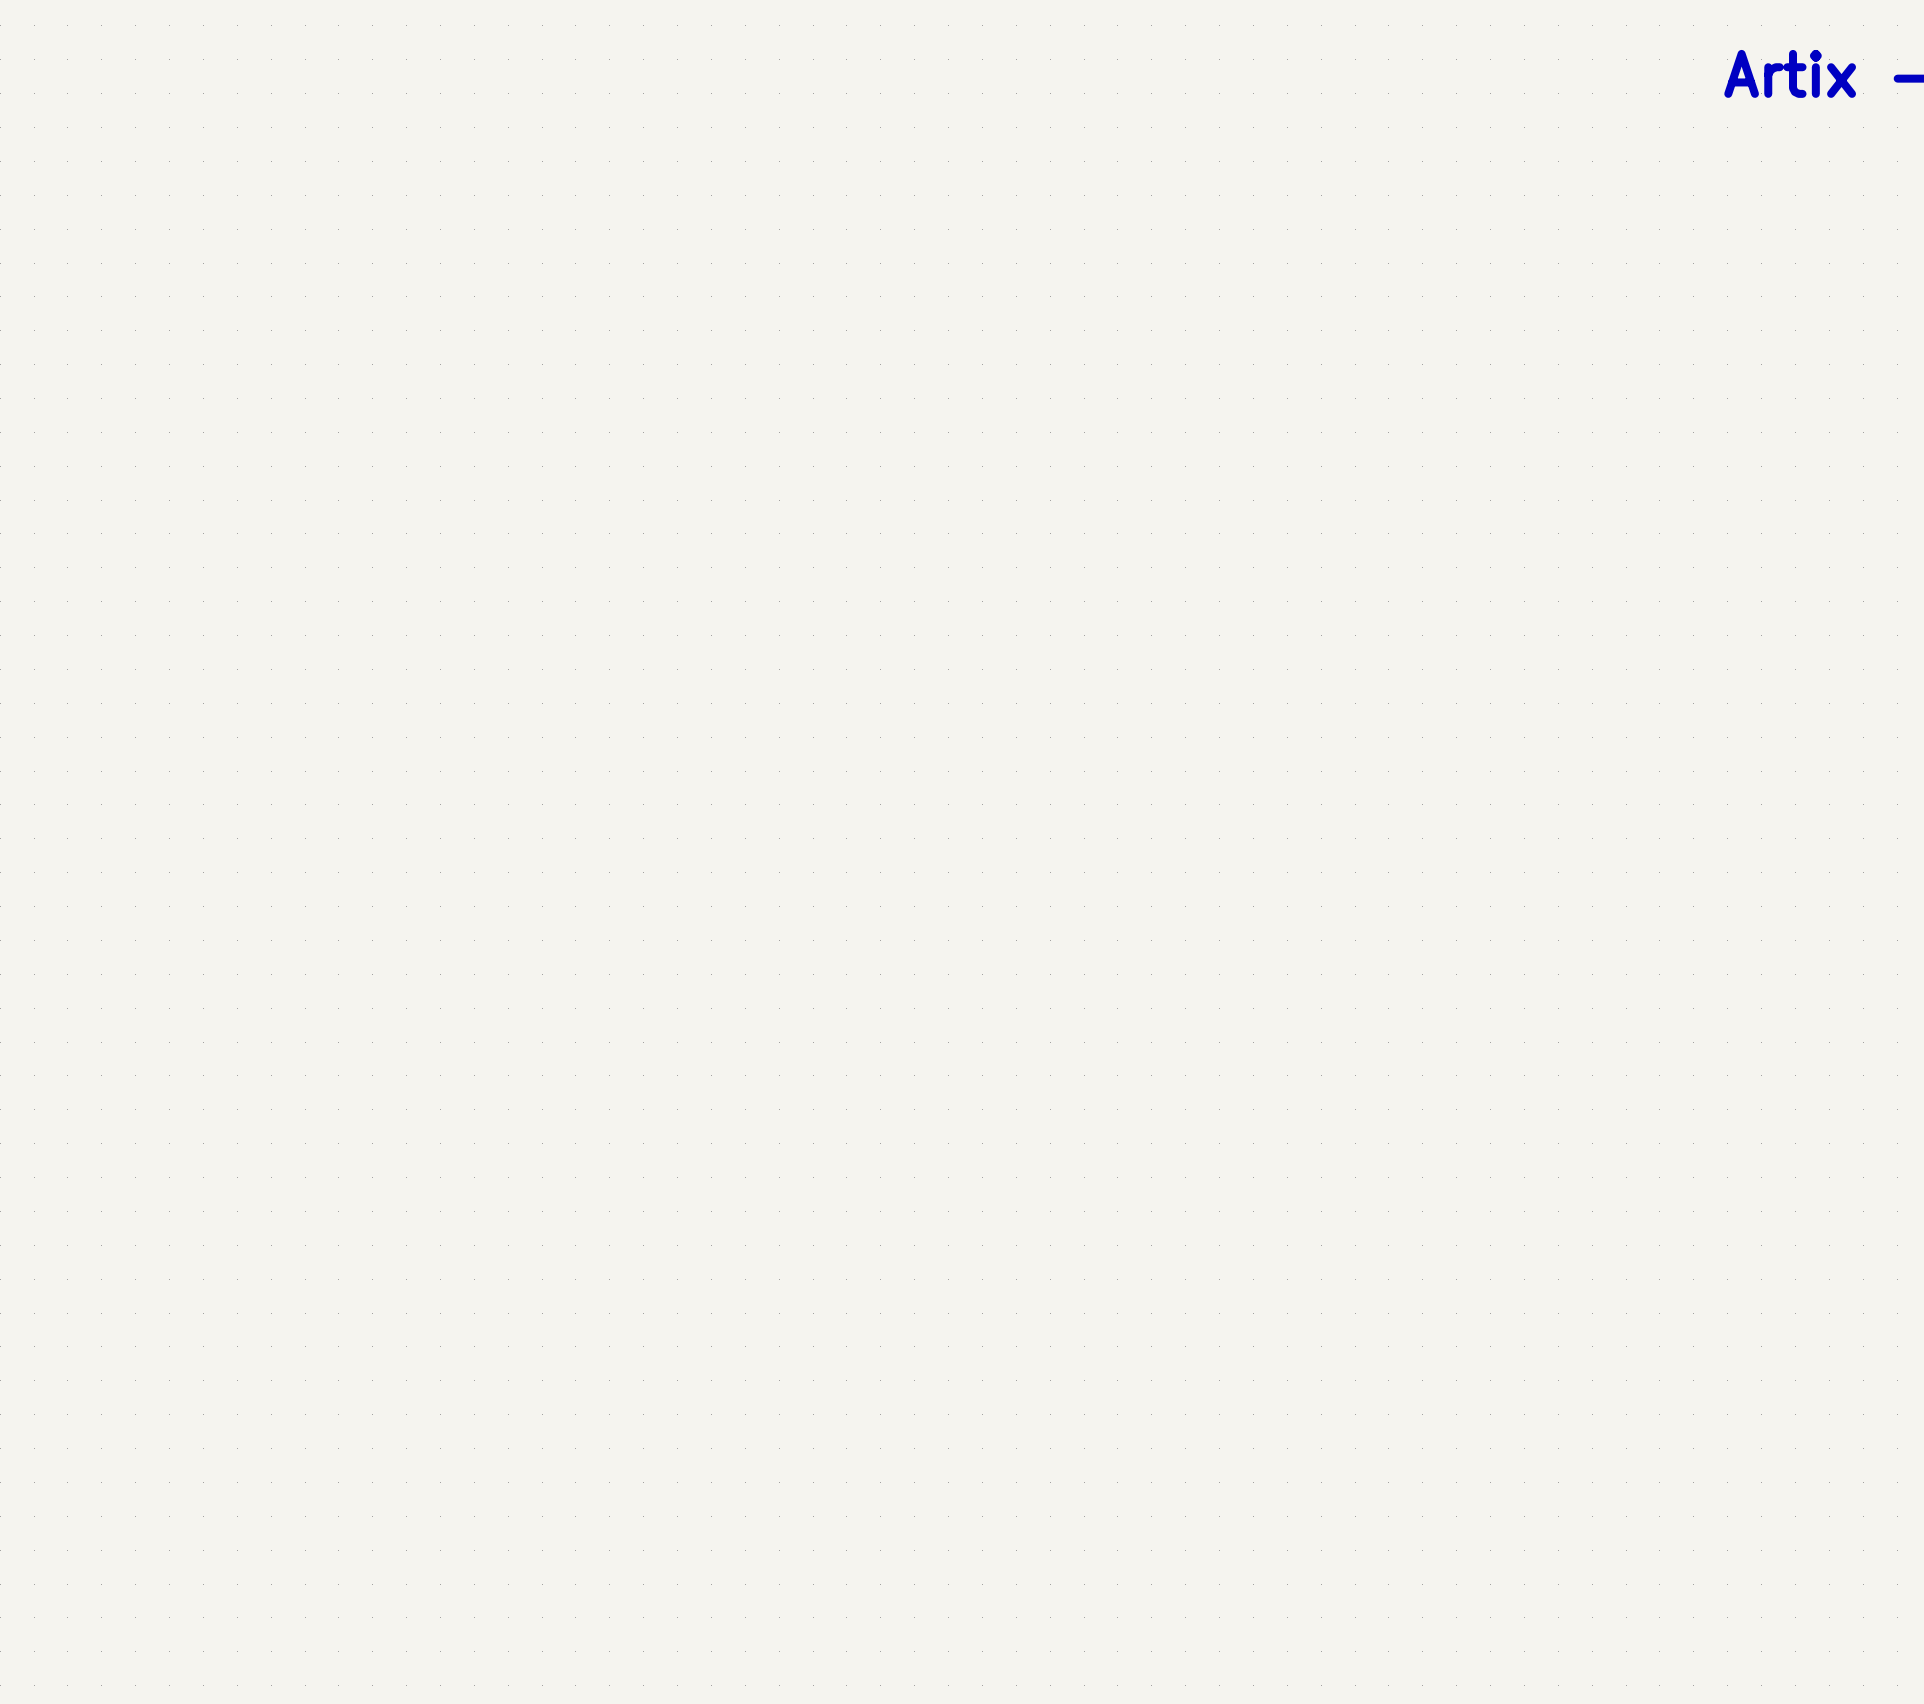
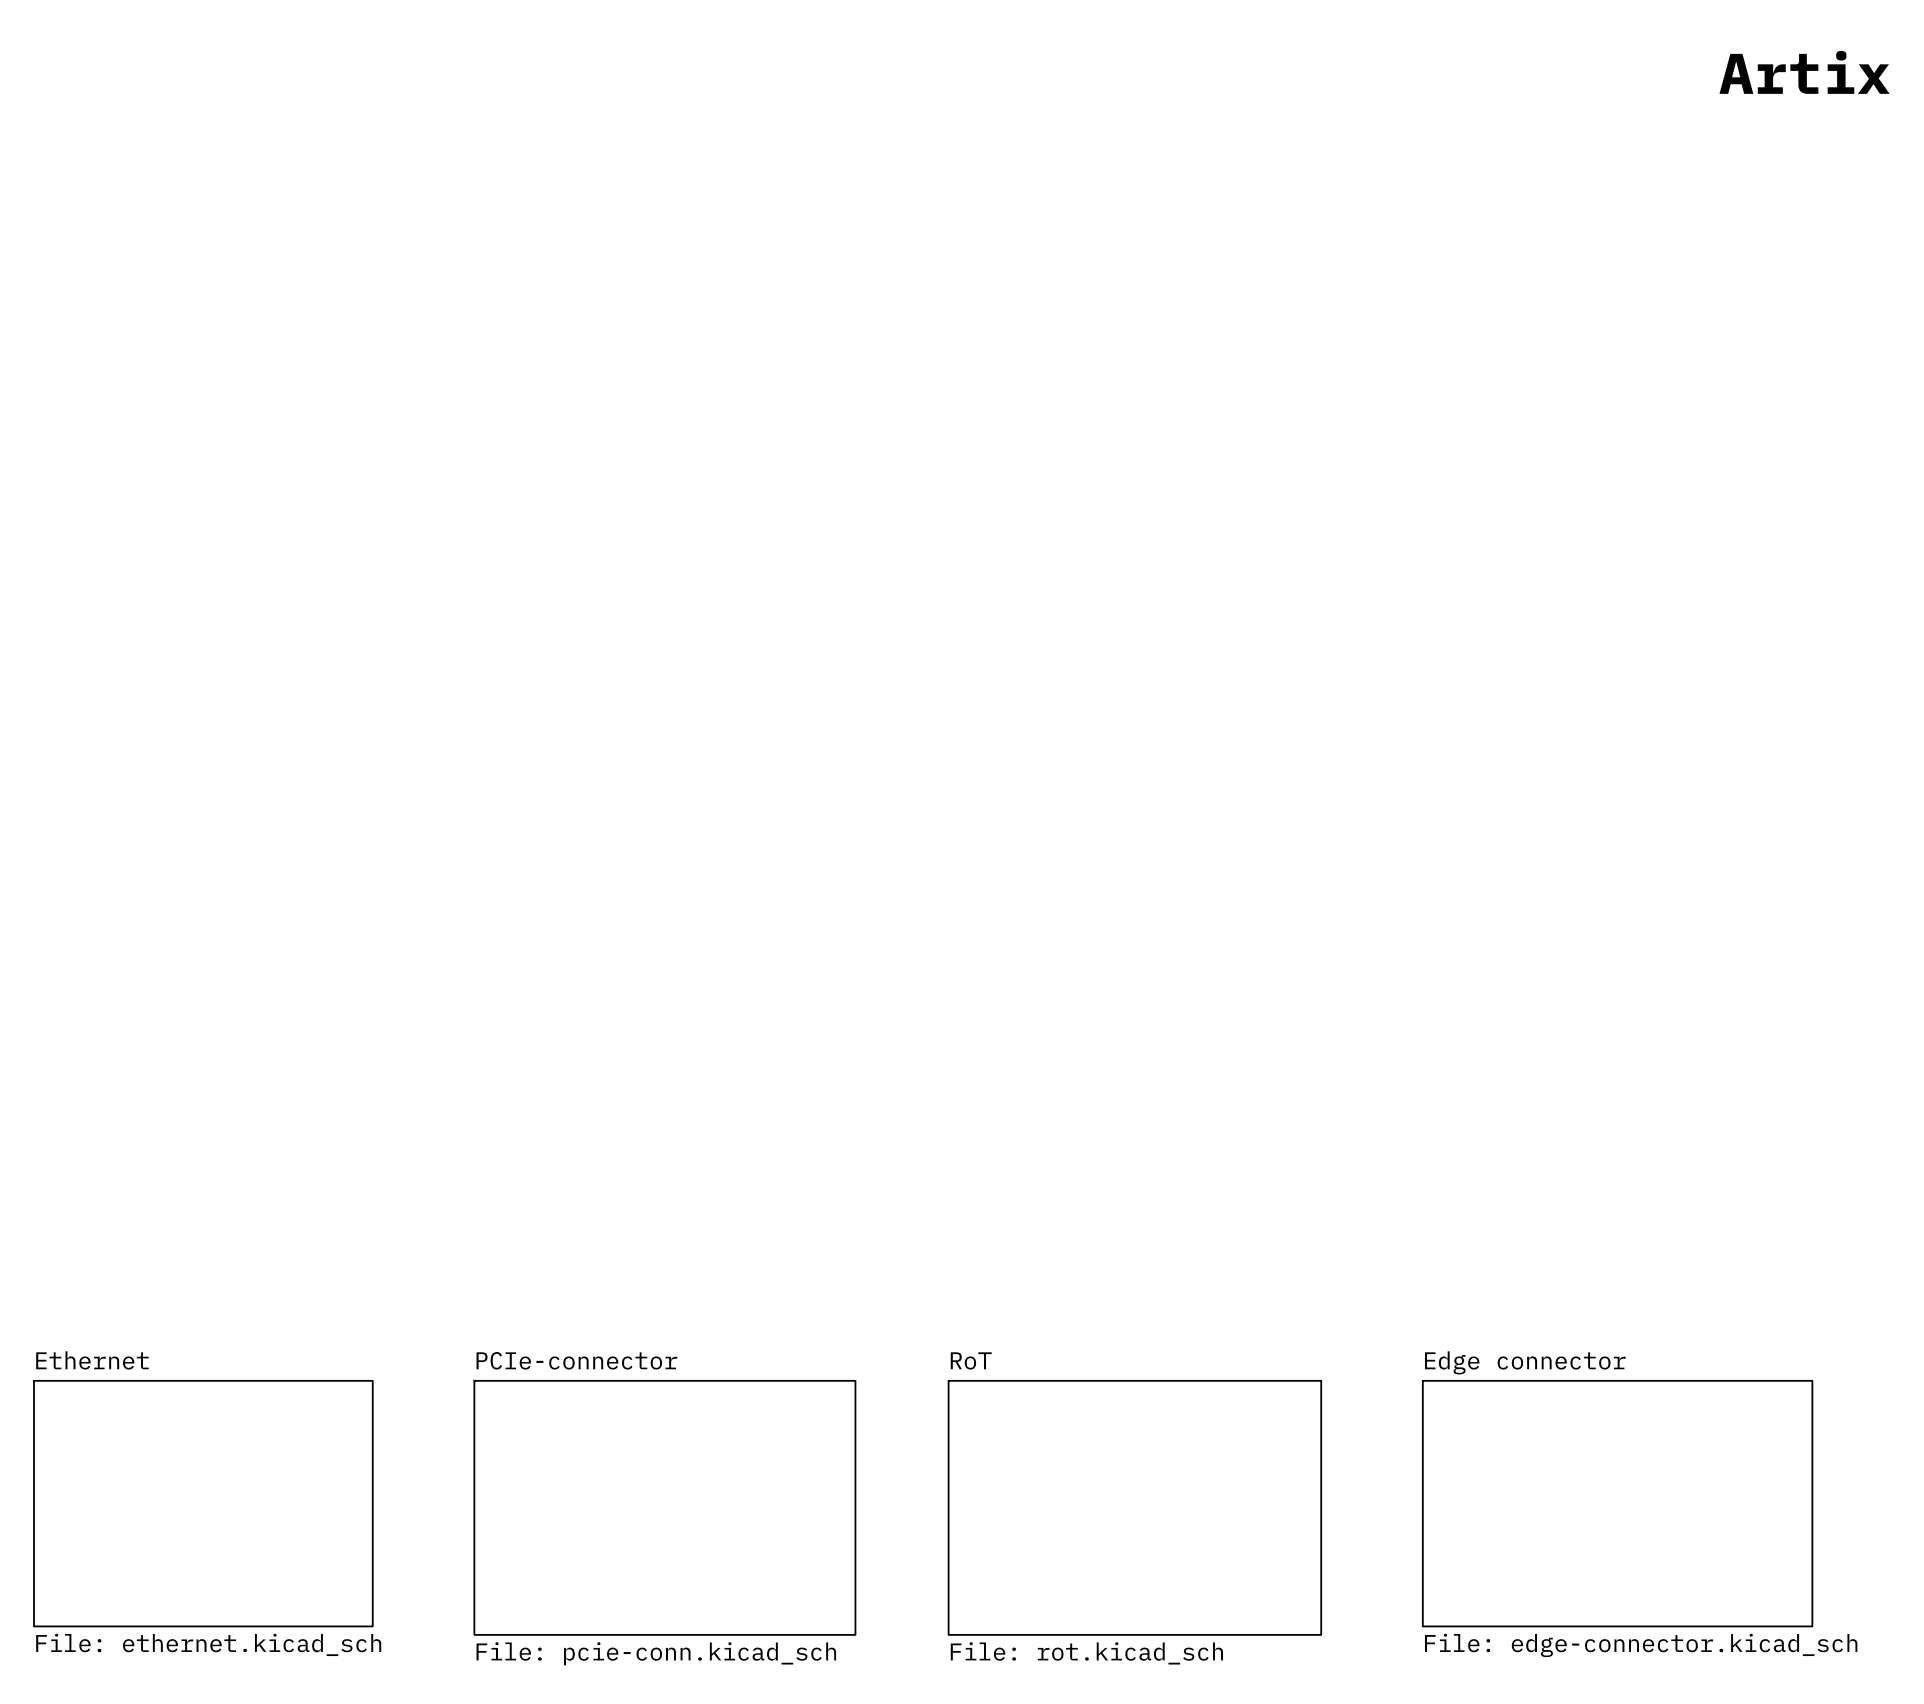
sheet Ethernet: none -> File: ethernet.kicad_sch (203, 1503)
sheet Edge connector: none -> File: edge-connector.kicad_sch (1617, 1503)
sheet PCIe-connector: none -> File: pcie-conn.kicad_sch (664, 1507)
sheet RoT: none -> File: rot.kicad_sch (1134, 1507)

